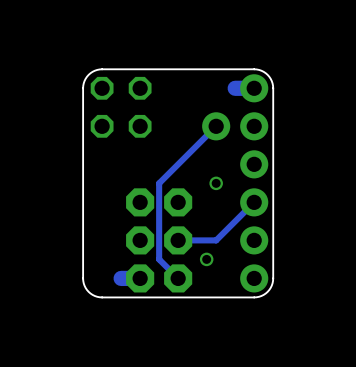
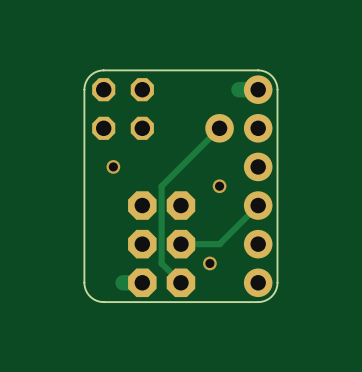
via: none -> (113, 166)

